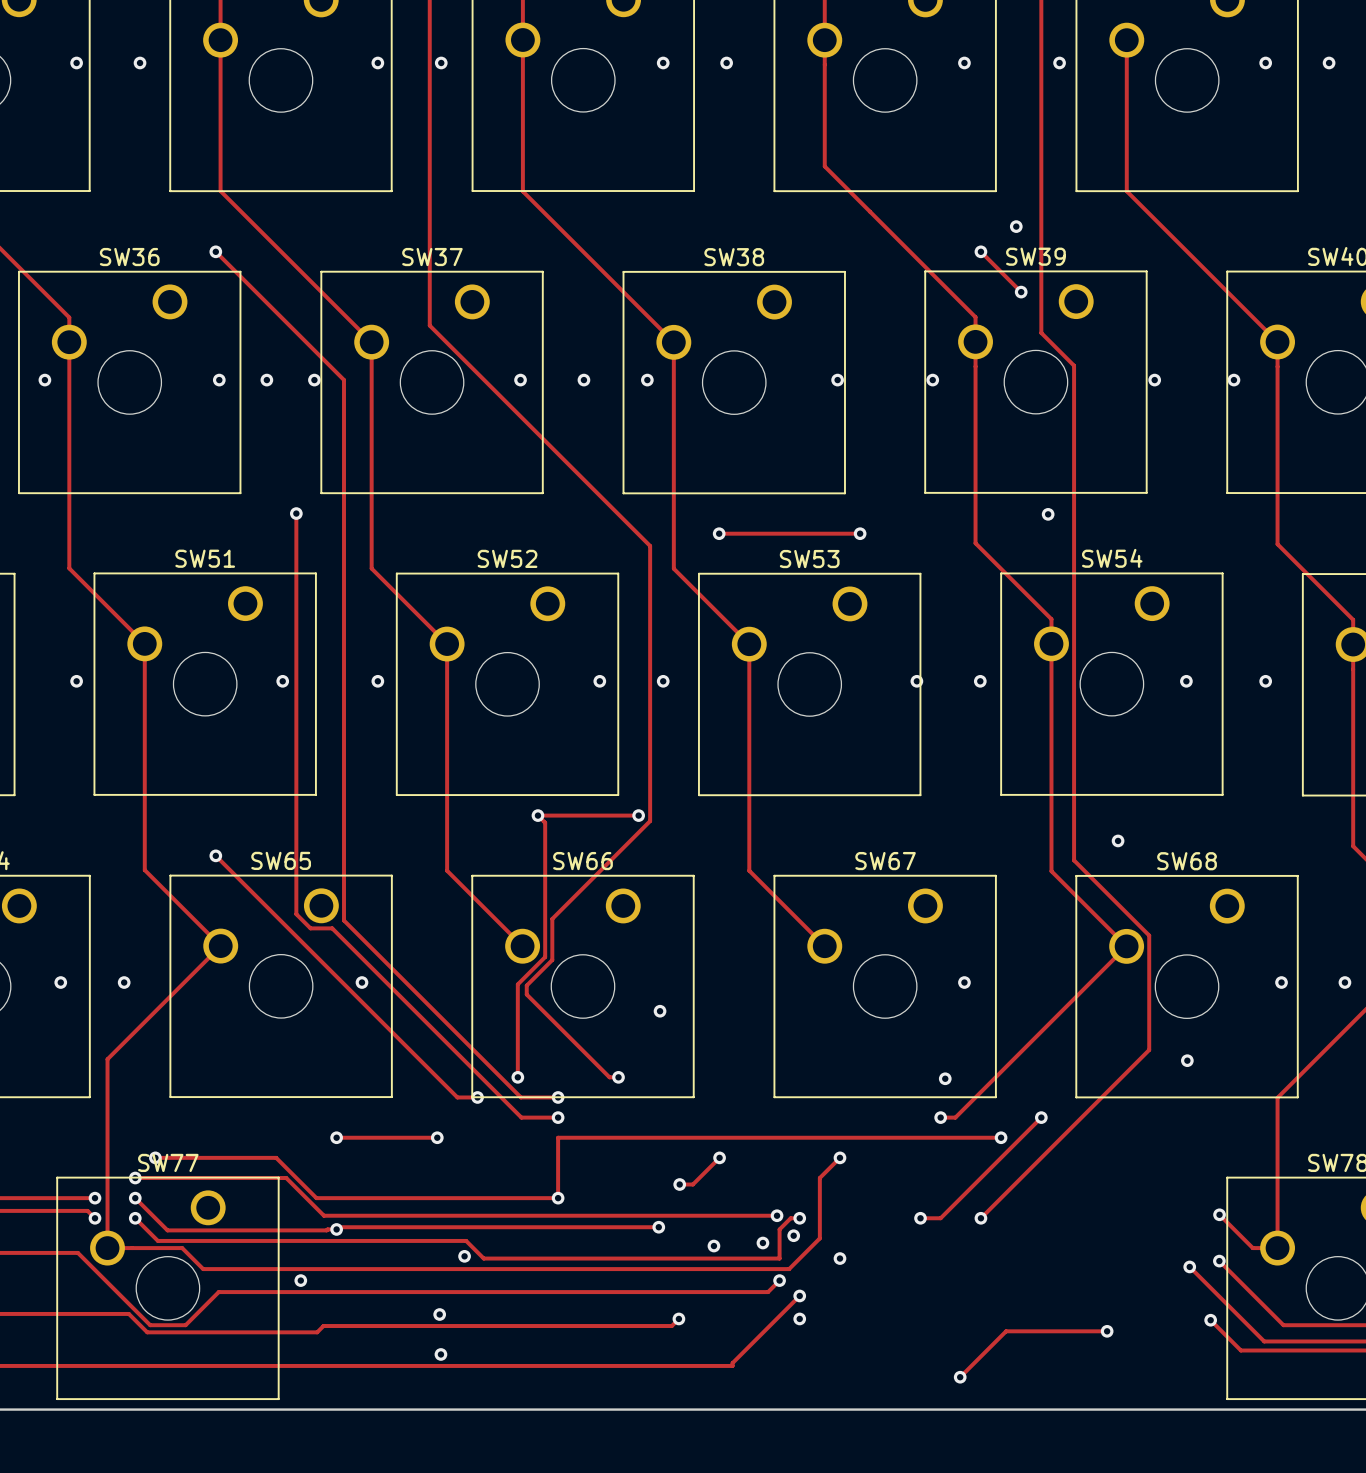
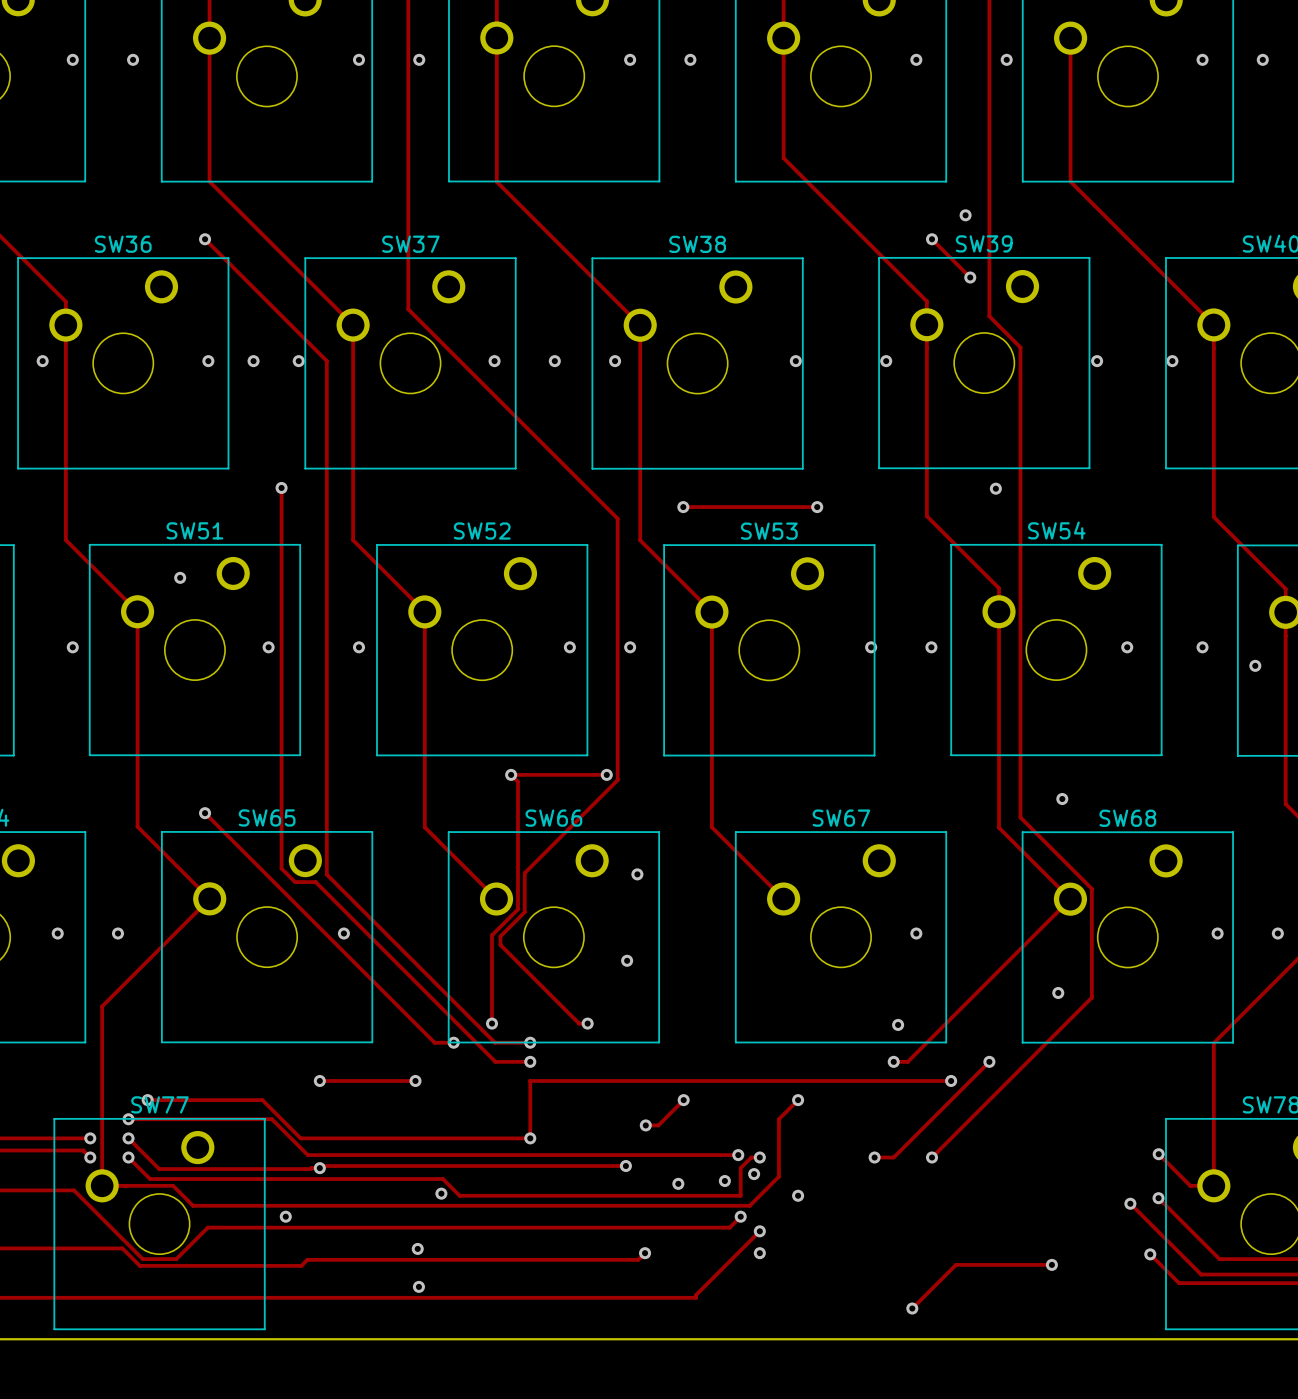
via: none -> (180, 577)
via: none -> (1255, 665)
via: none -> (637, 874)
via position: (1187, 1060) -> (1058, 992)

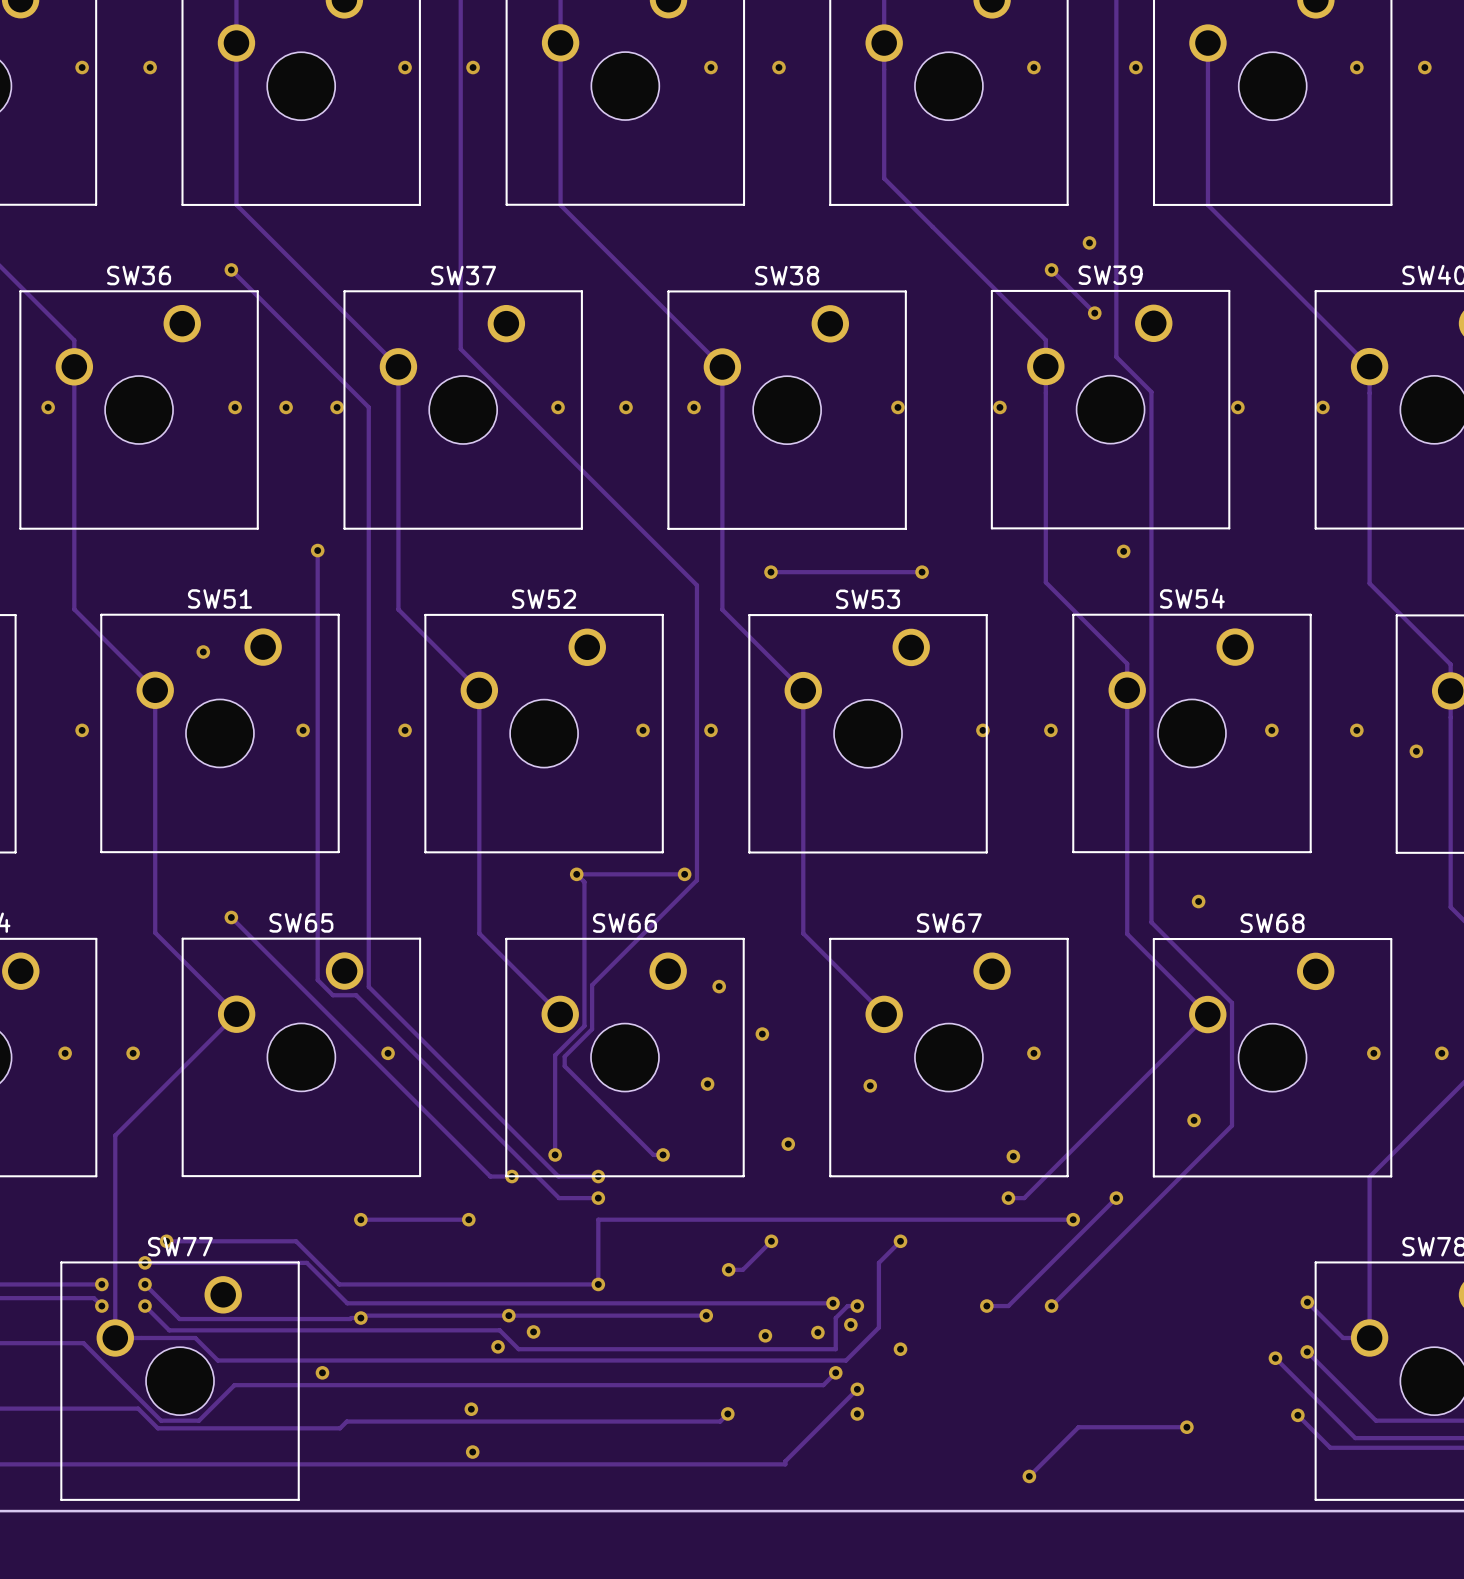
via: none -> (762, 1034)
via: none -> (870, 1085)
via: none -> (788, 1144)
via: none -> (508, 1315)
via: none -> (533, 1331)

